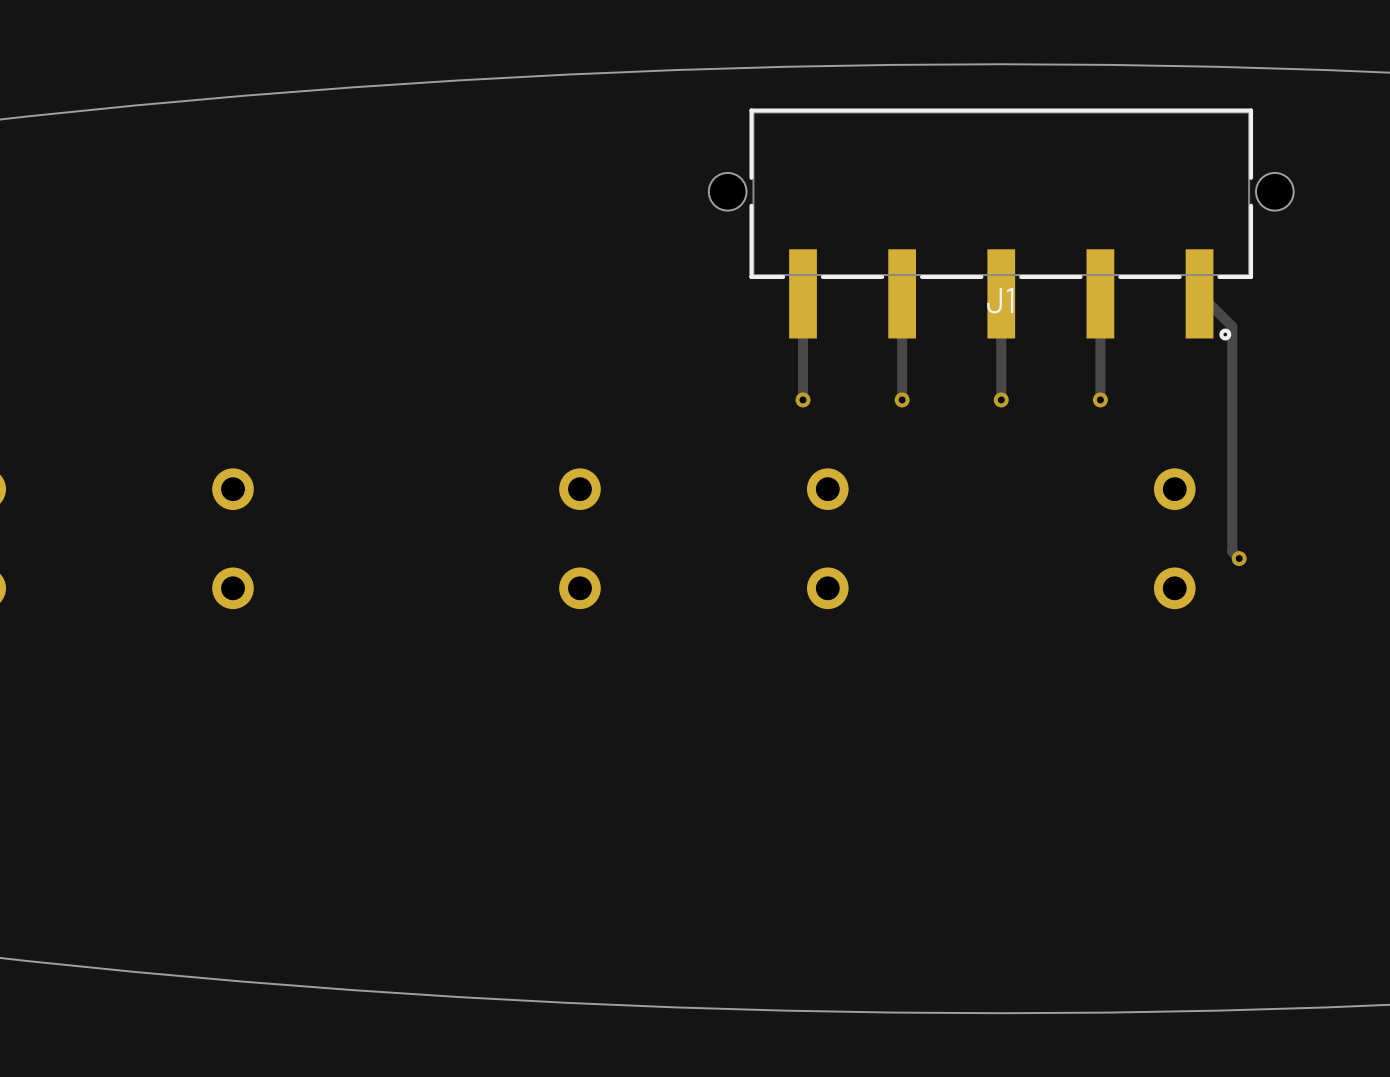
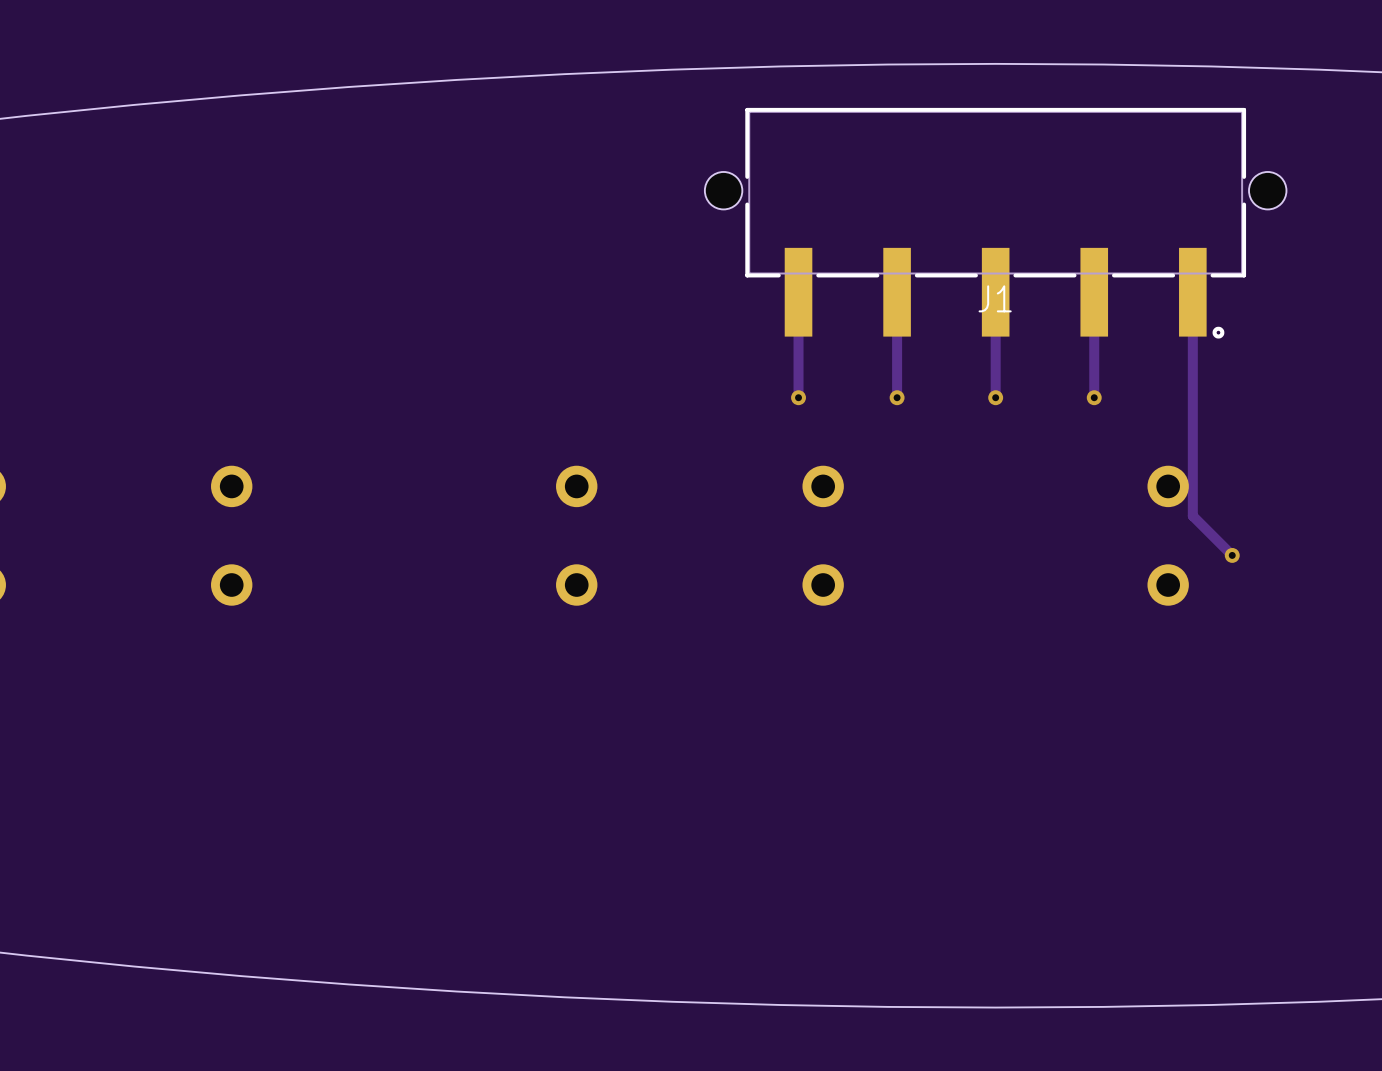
track: (1199, 293) (1232, 326) (1232, 551) -> (1192, 292) (1192, 516) (1225, 548)

